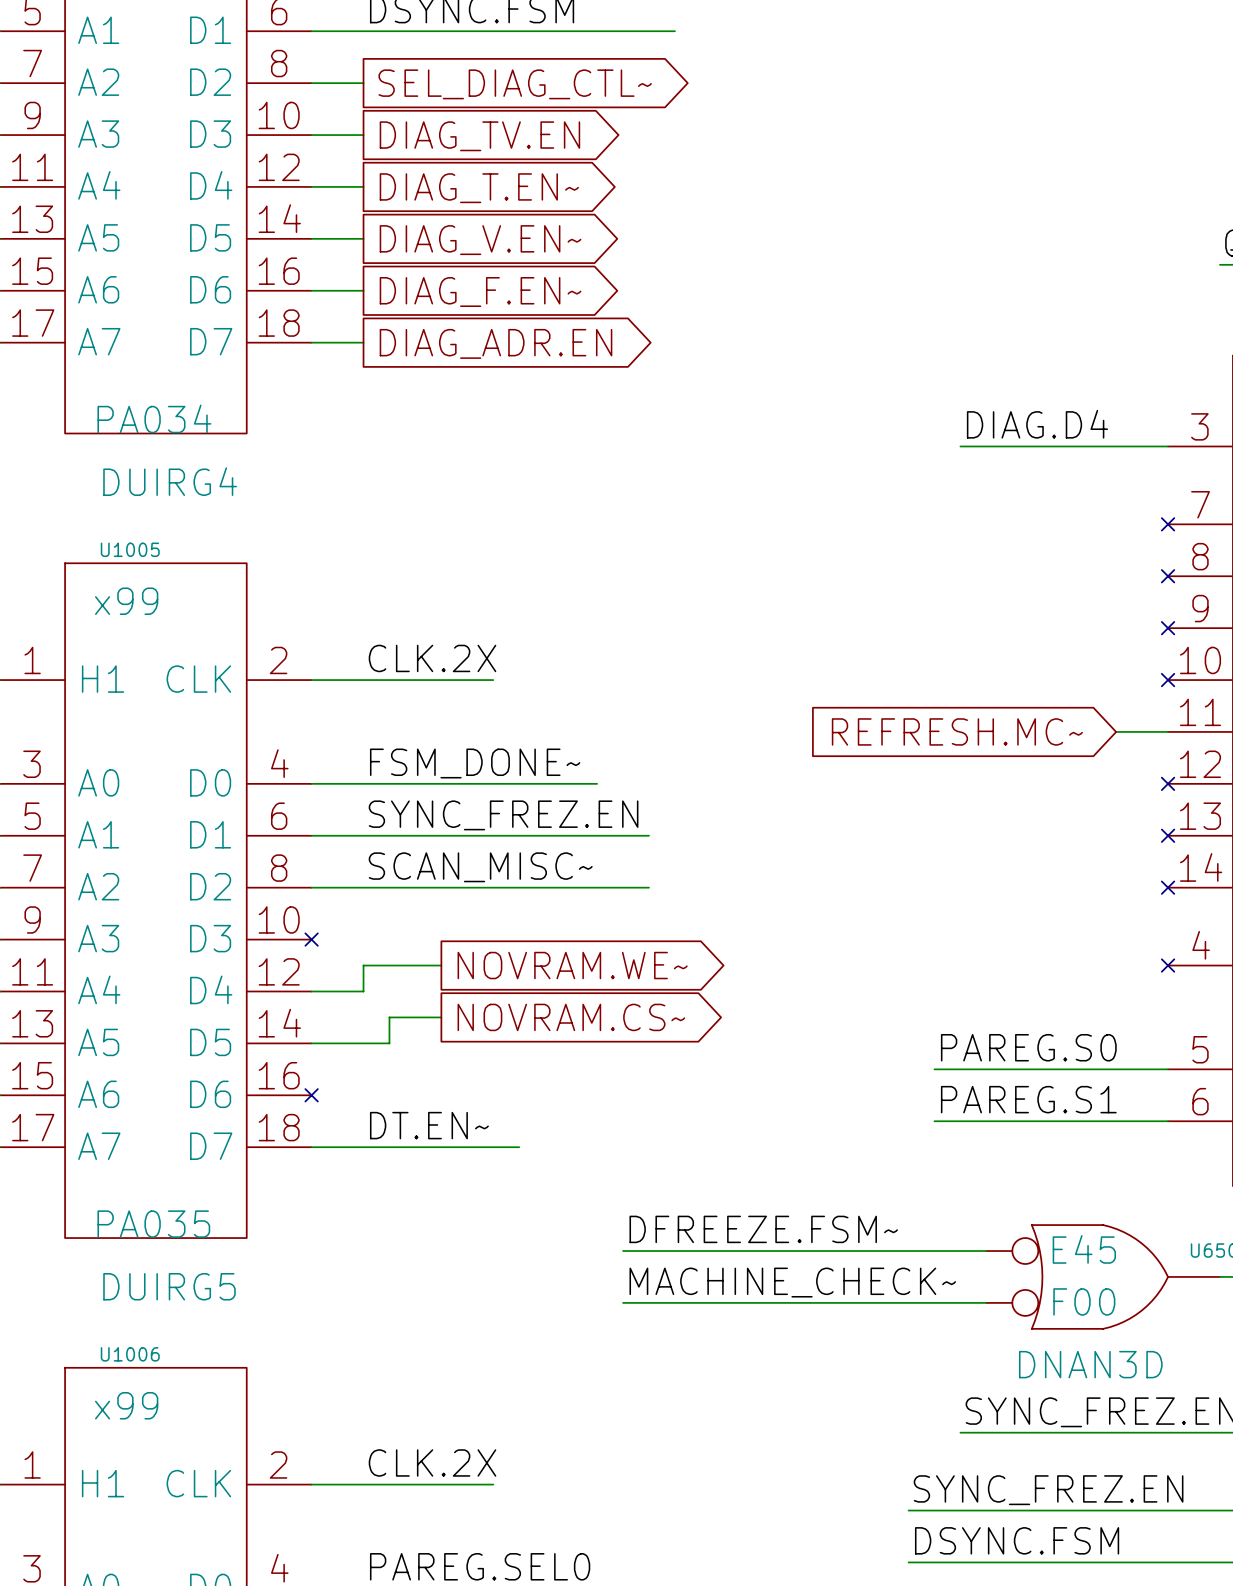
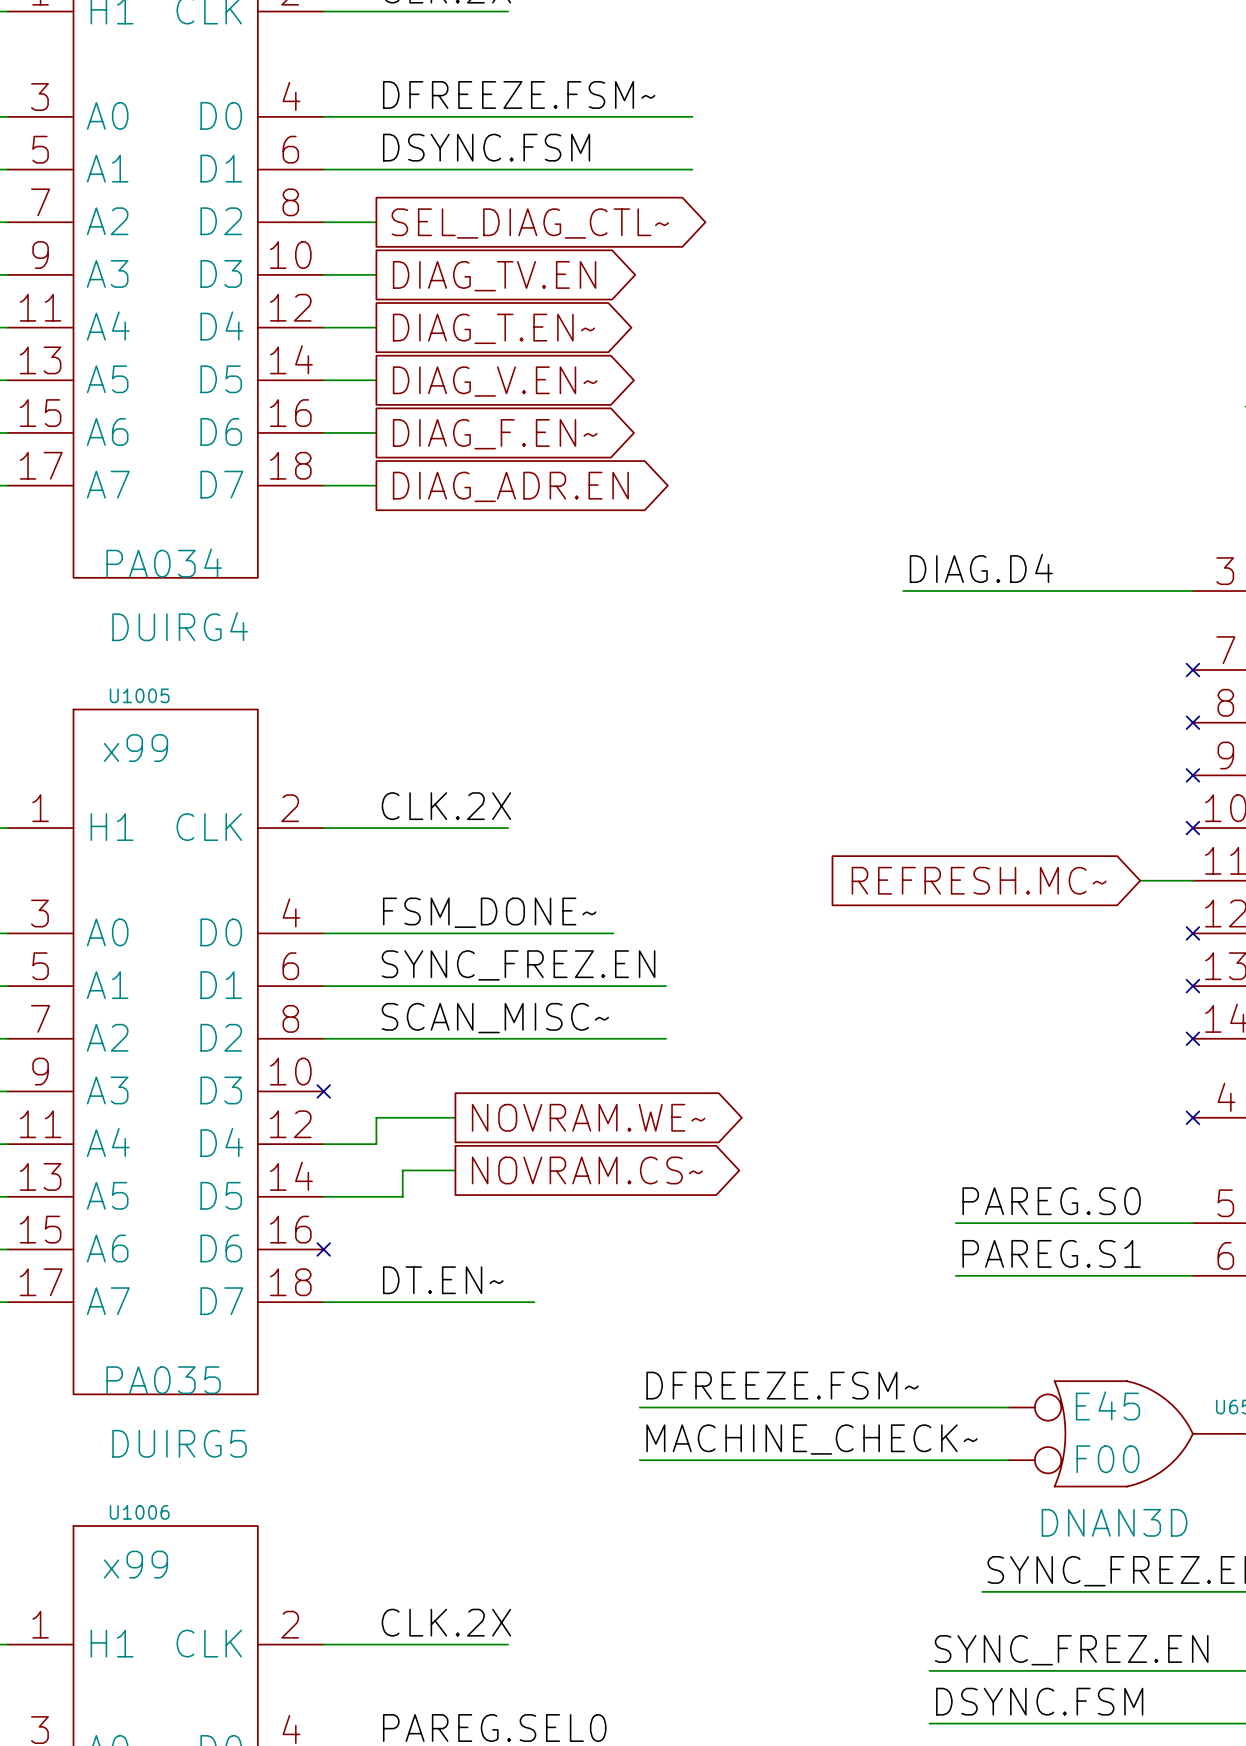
label position: DIAG.D4 (1037, 424) -> DIAG.D4 (981, 568)
wire: none -> (903, 591) (982, 591)

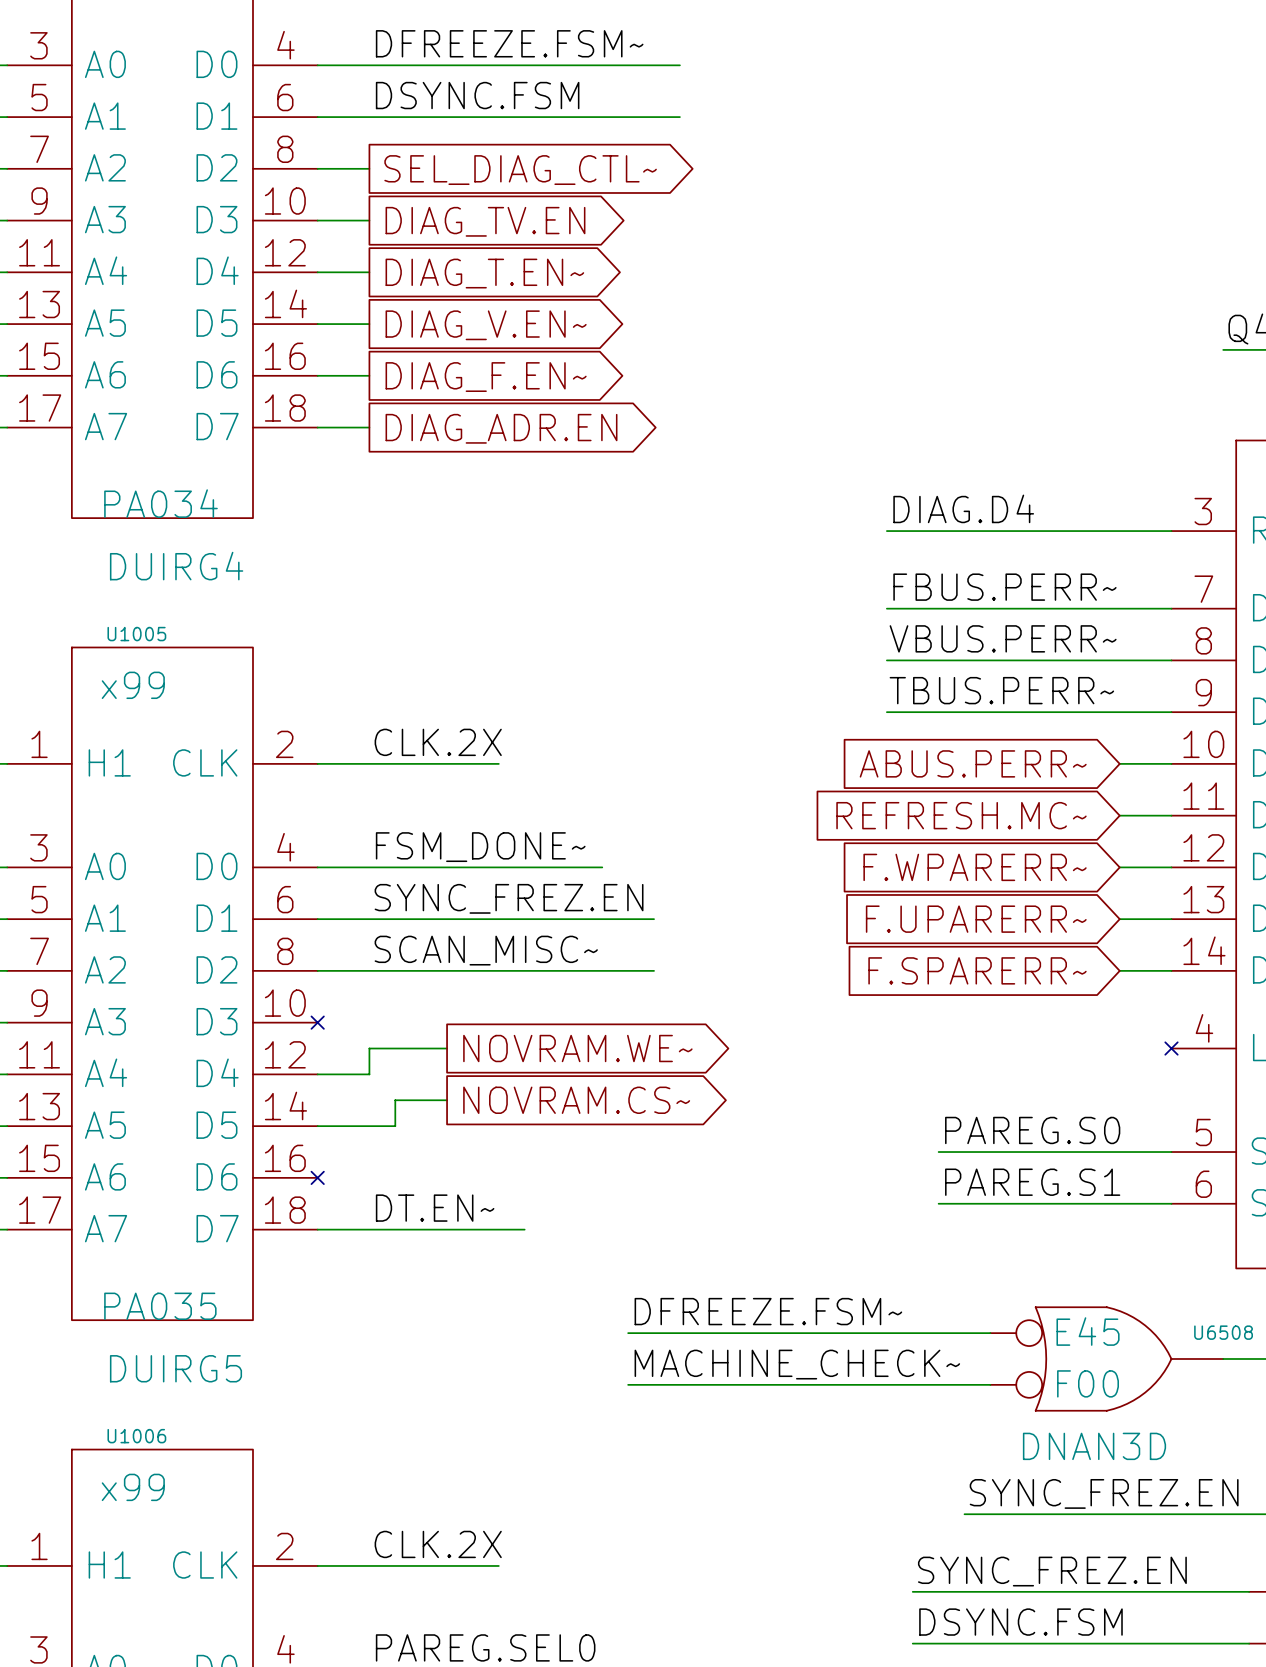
label: none -> FBUS.PERR~ (1004, 587)
wire: none -> (886, 608) (1171, 608)
no-connect mark: (1192, 670) -> none
label: none -> VBUS.PERR~ (1003, 638)
wire: none -> (886, 660) (1171, 660)
no-connect mark: (1192, 722) -> none
label: none -> TBUS.PERR~ (1001, 690)
wire: none -> (886, 712) (1171, 712)
no-connect mark: (1192, 775) -> none
global label: none -> ABUS.PERR~ (973, 763)
wire: none -> (1119, 763) (1171, 763)
no-connect mark: (1192, 828) -> none
global label: none -> F.WPARERR~ (975, 867)
wire: none -> (1119, 867) (1171, 867)
no-connect mark: (1192, 933) -> none
global label: none -> F.UPARERR~ (976, 919)
wire: none -> (1119, 919) (1171, 919)
no-connect mark: (1192, 986) -> none
global label: none -> F.SPARERR~ (977, 970)
wire: none -> (1119, 970) (1171, 970)
no-connect mark: (1192, 1038) -> none

